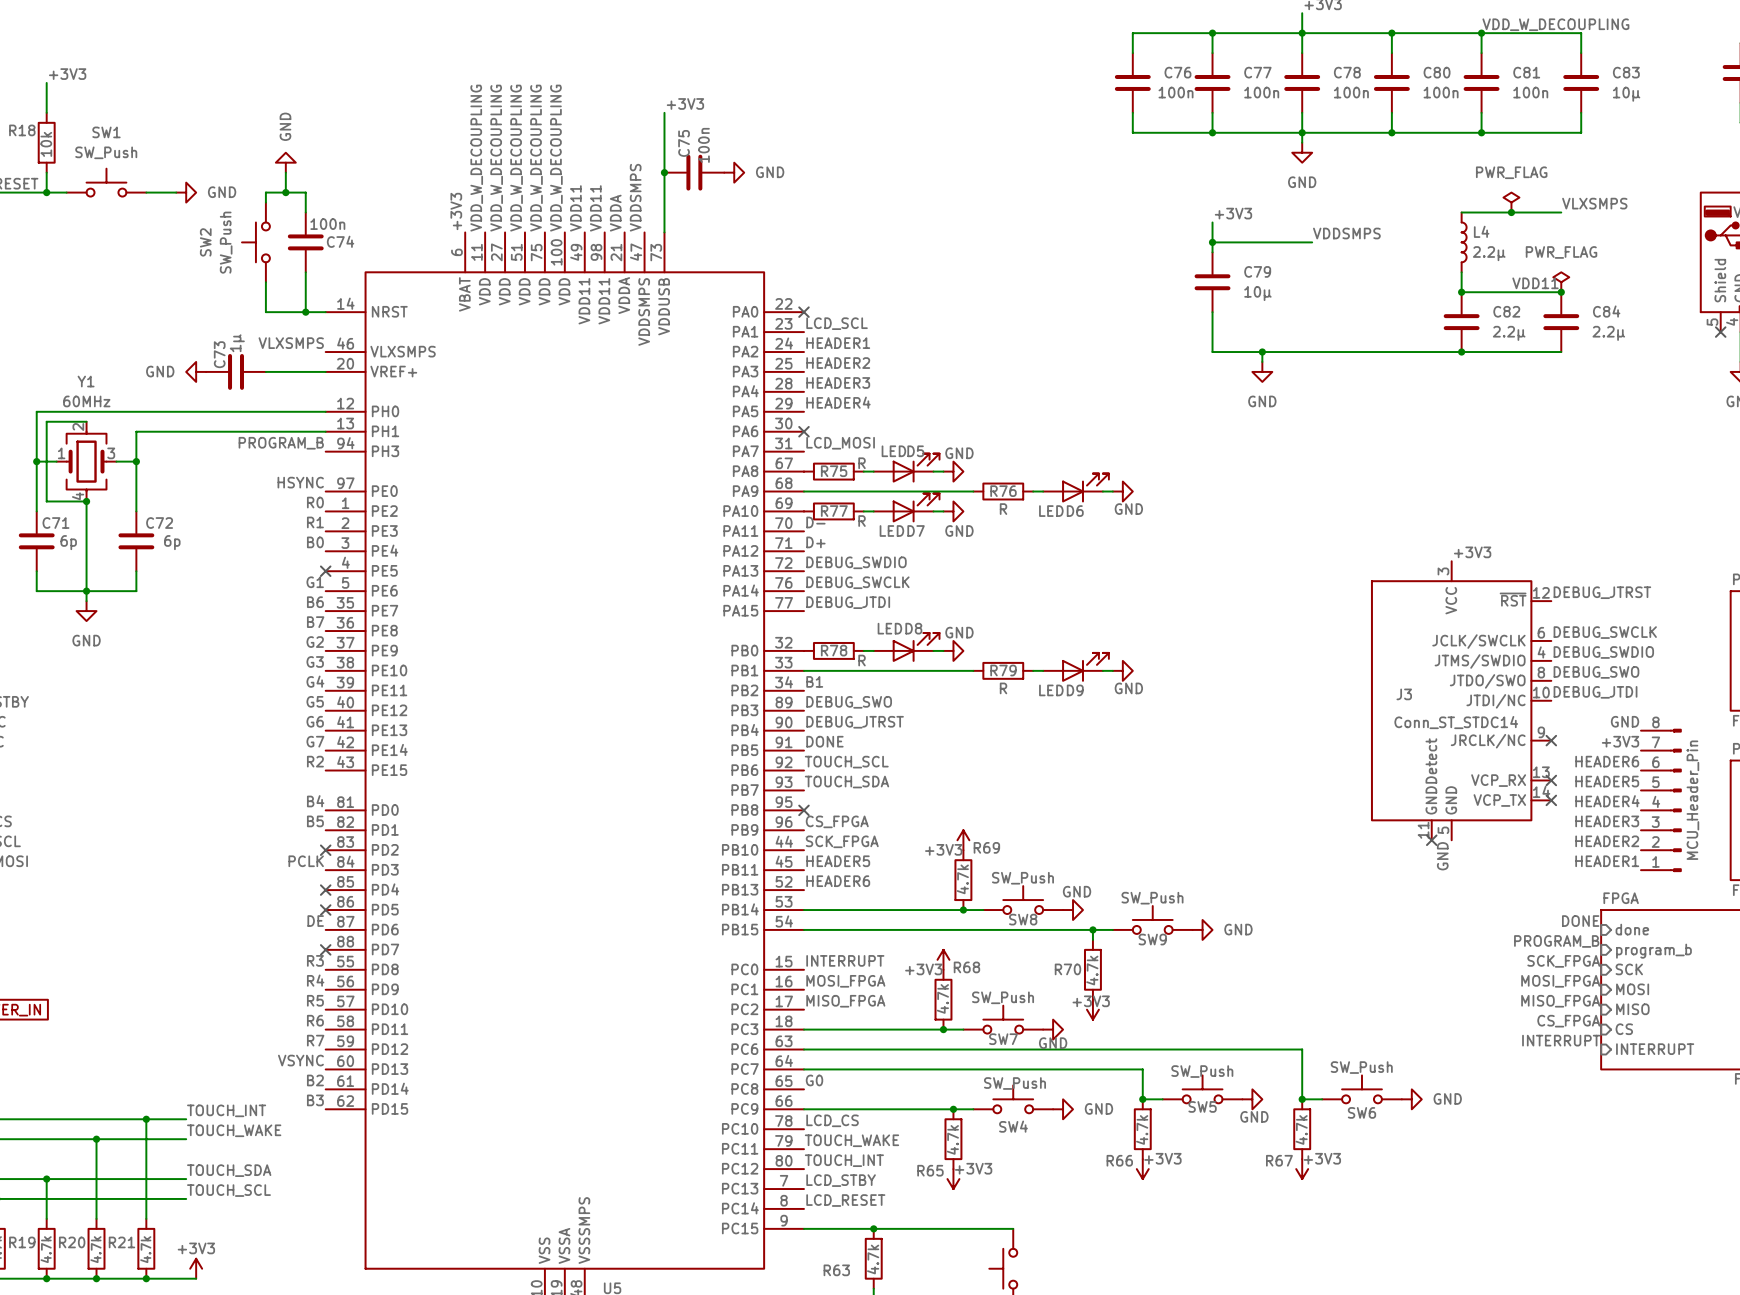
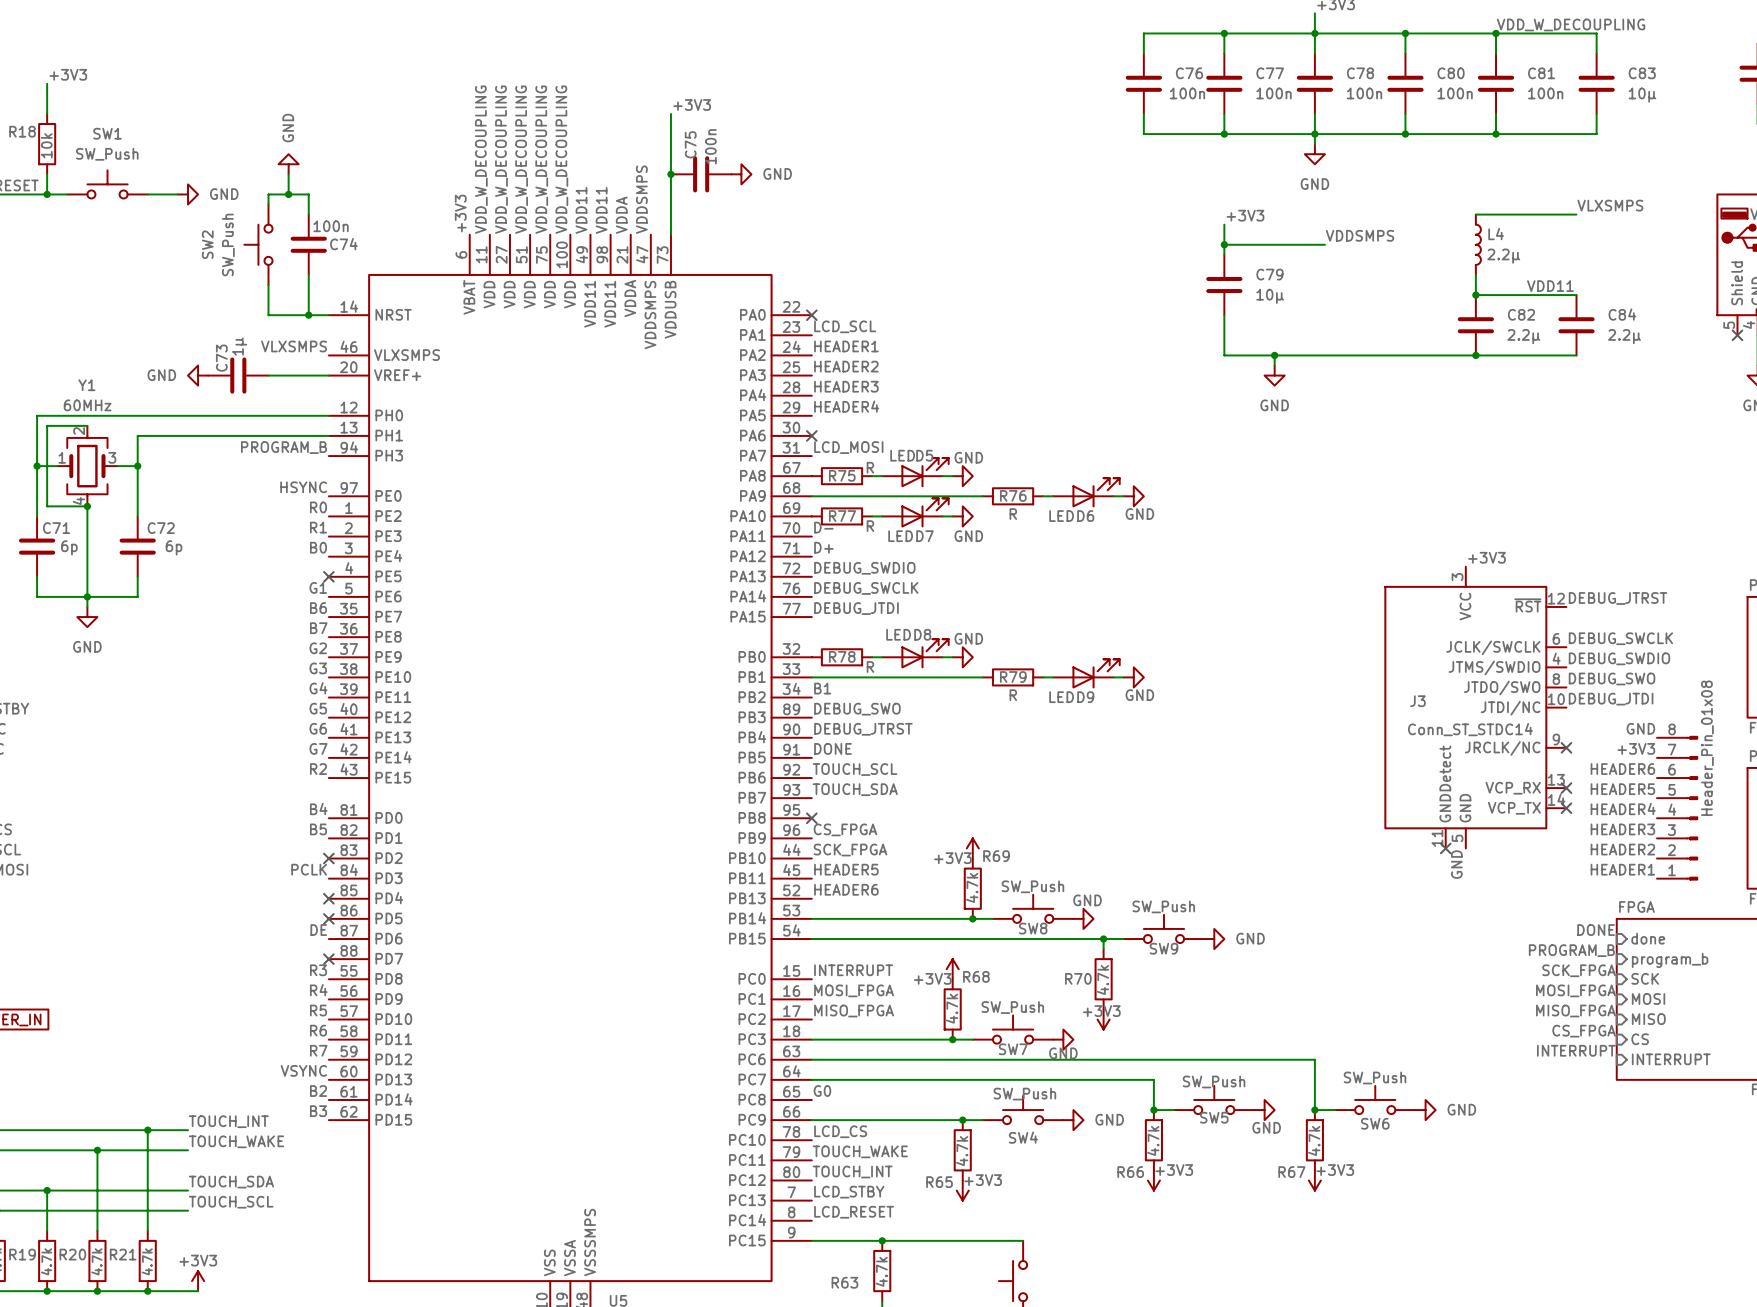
power symbol: PWR_FLAG (1511, 202) -> none
junction: (1511, 212) -> none
power symbol: PWR_FLAG (1561, 282) -> none
junction: (1561, 292) -> none
part value: MCU_Header_Pin (1692, 800) -> Header_Pin_01x08 (1707, 748)

